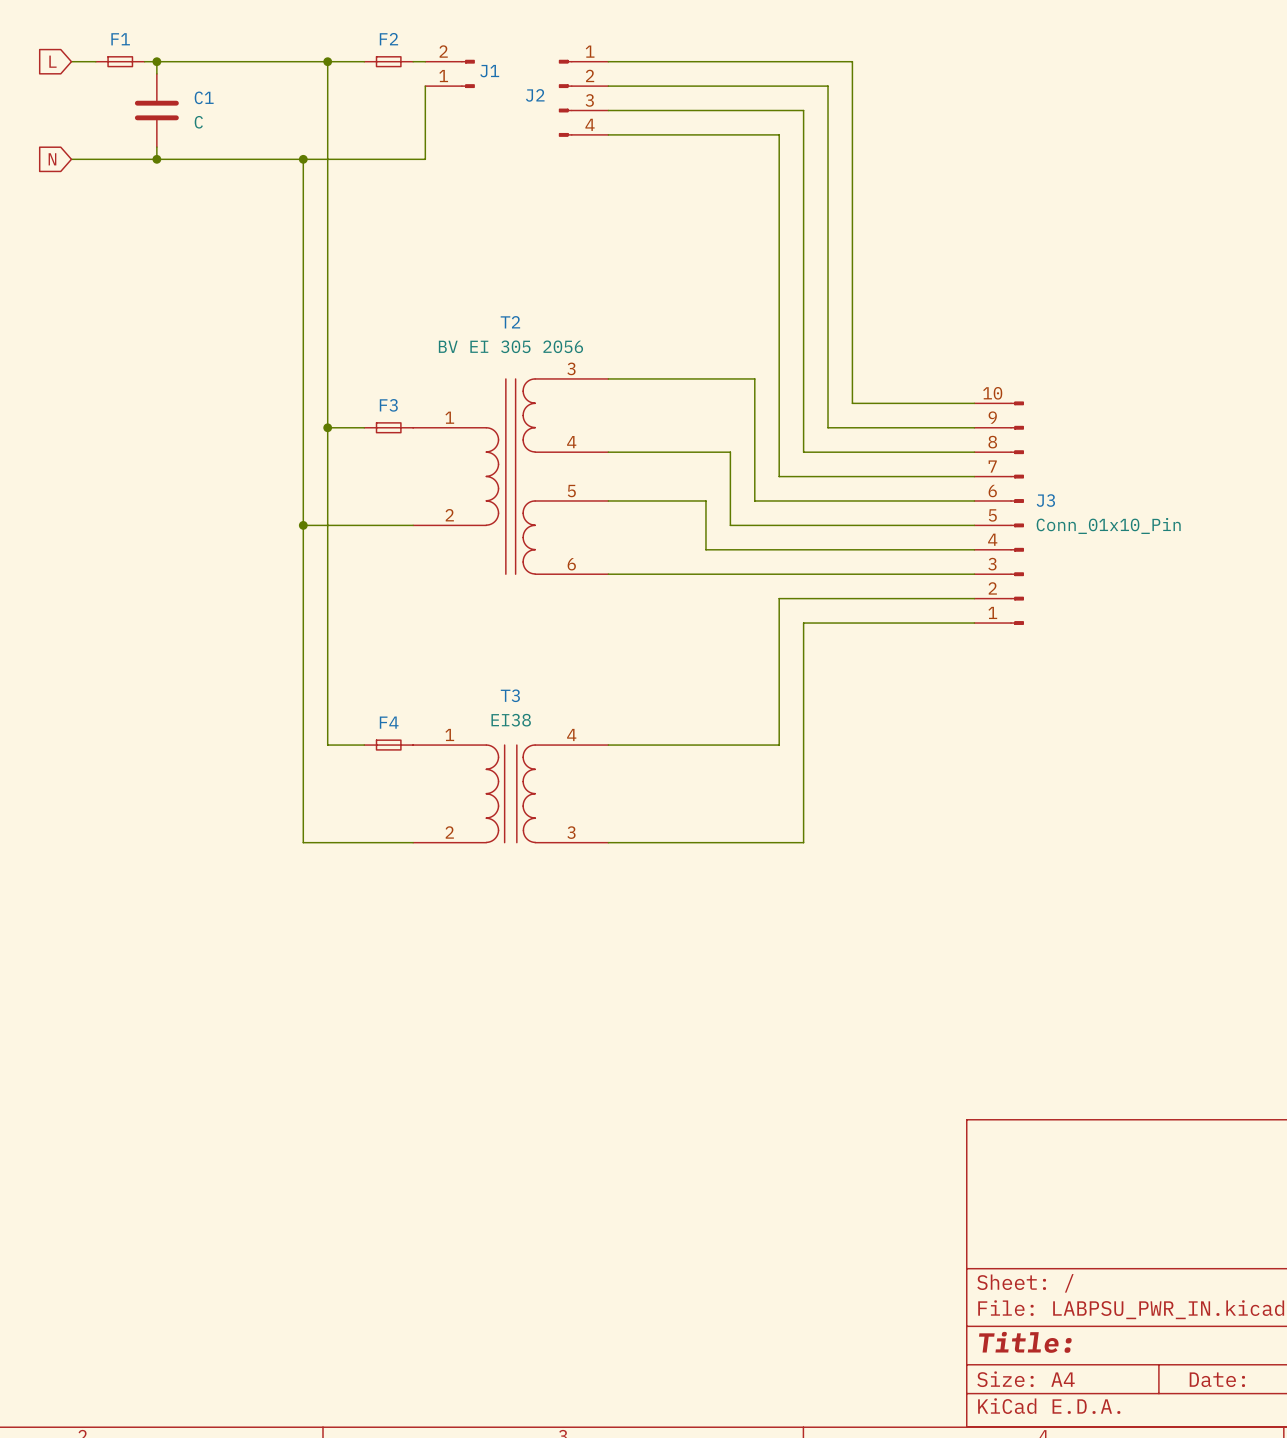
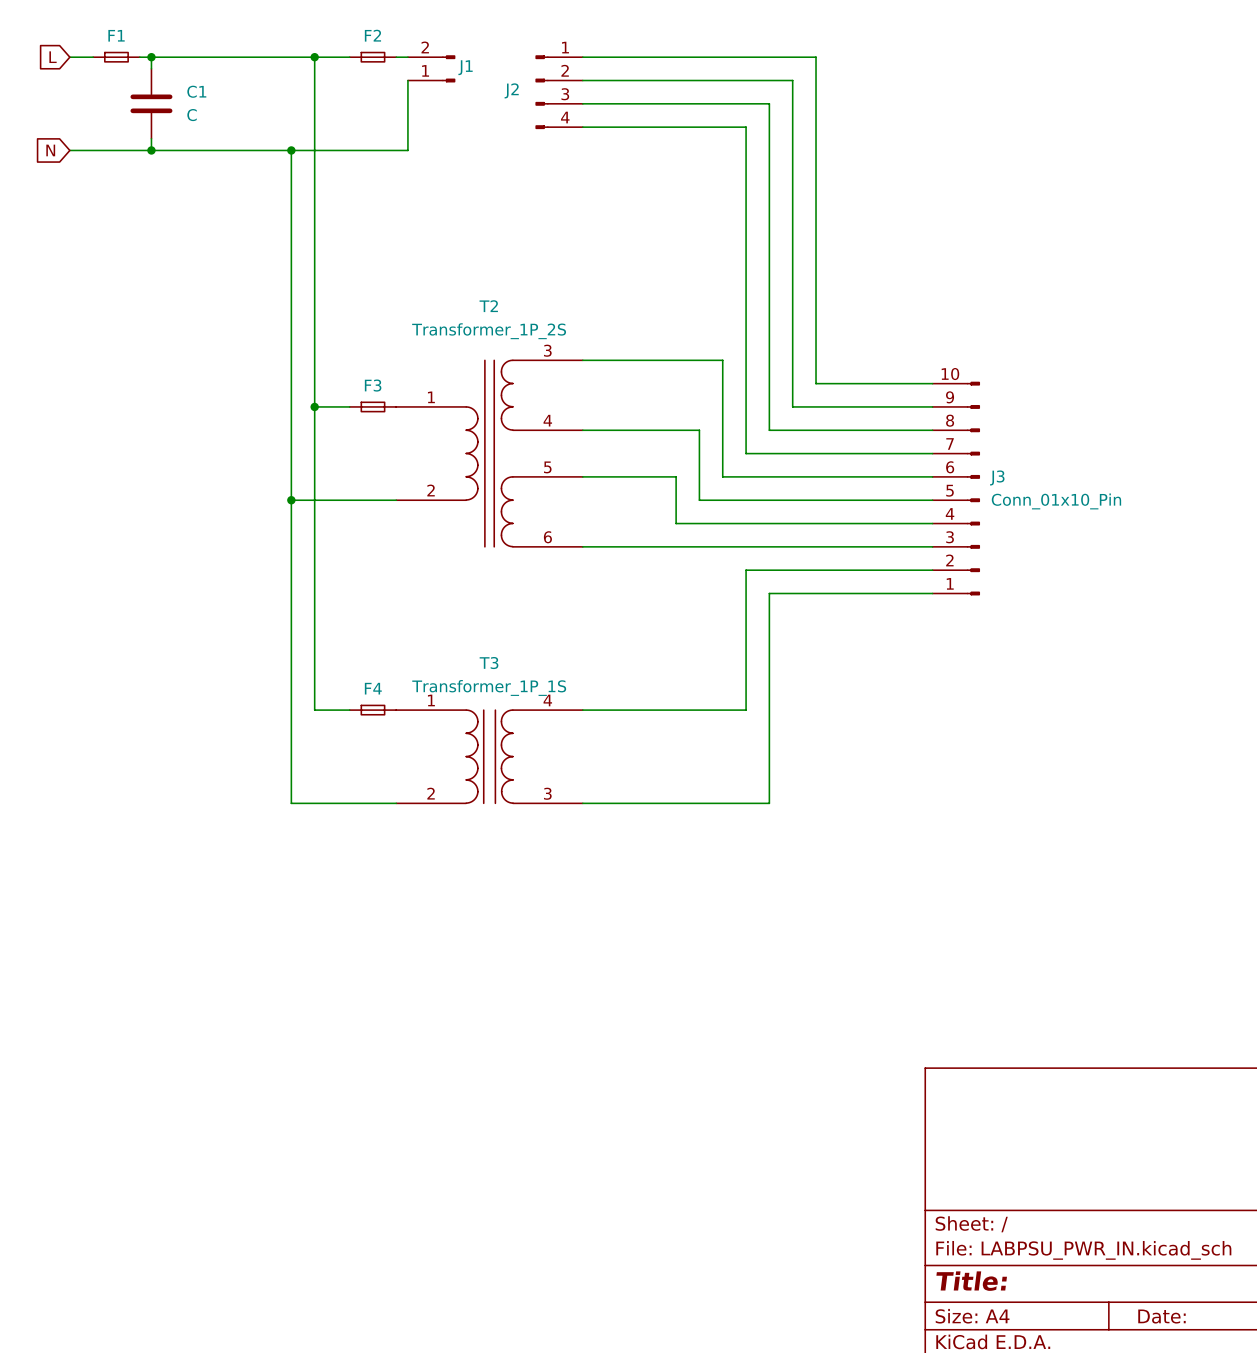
T2 value: BV EI 305 2056 (510, 346) -> Transformer_1P_2S (489, 331)
T3 value: EI38 (511, 720) -> Transformer_1P_1S (489, 687)

